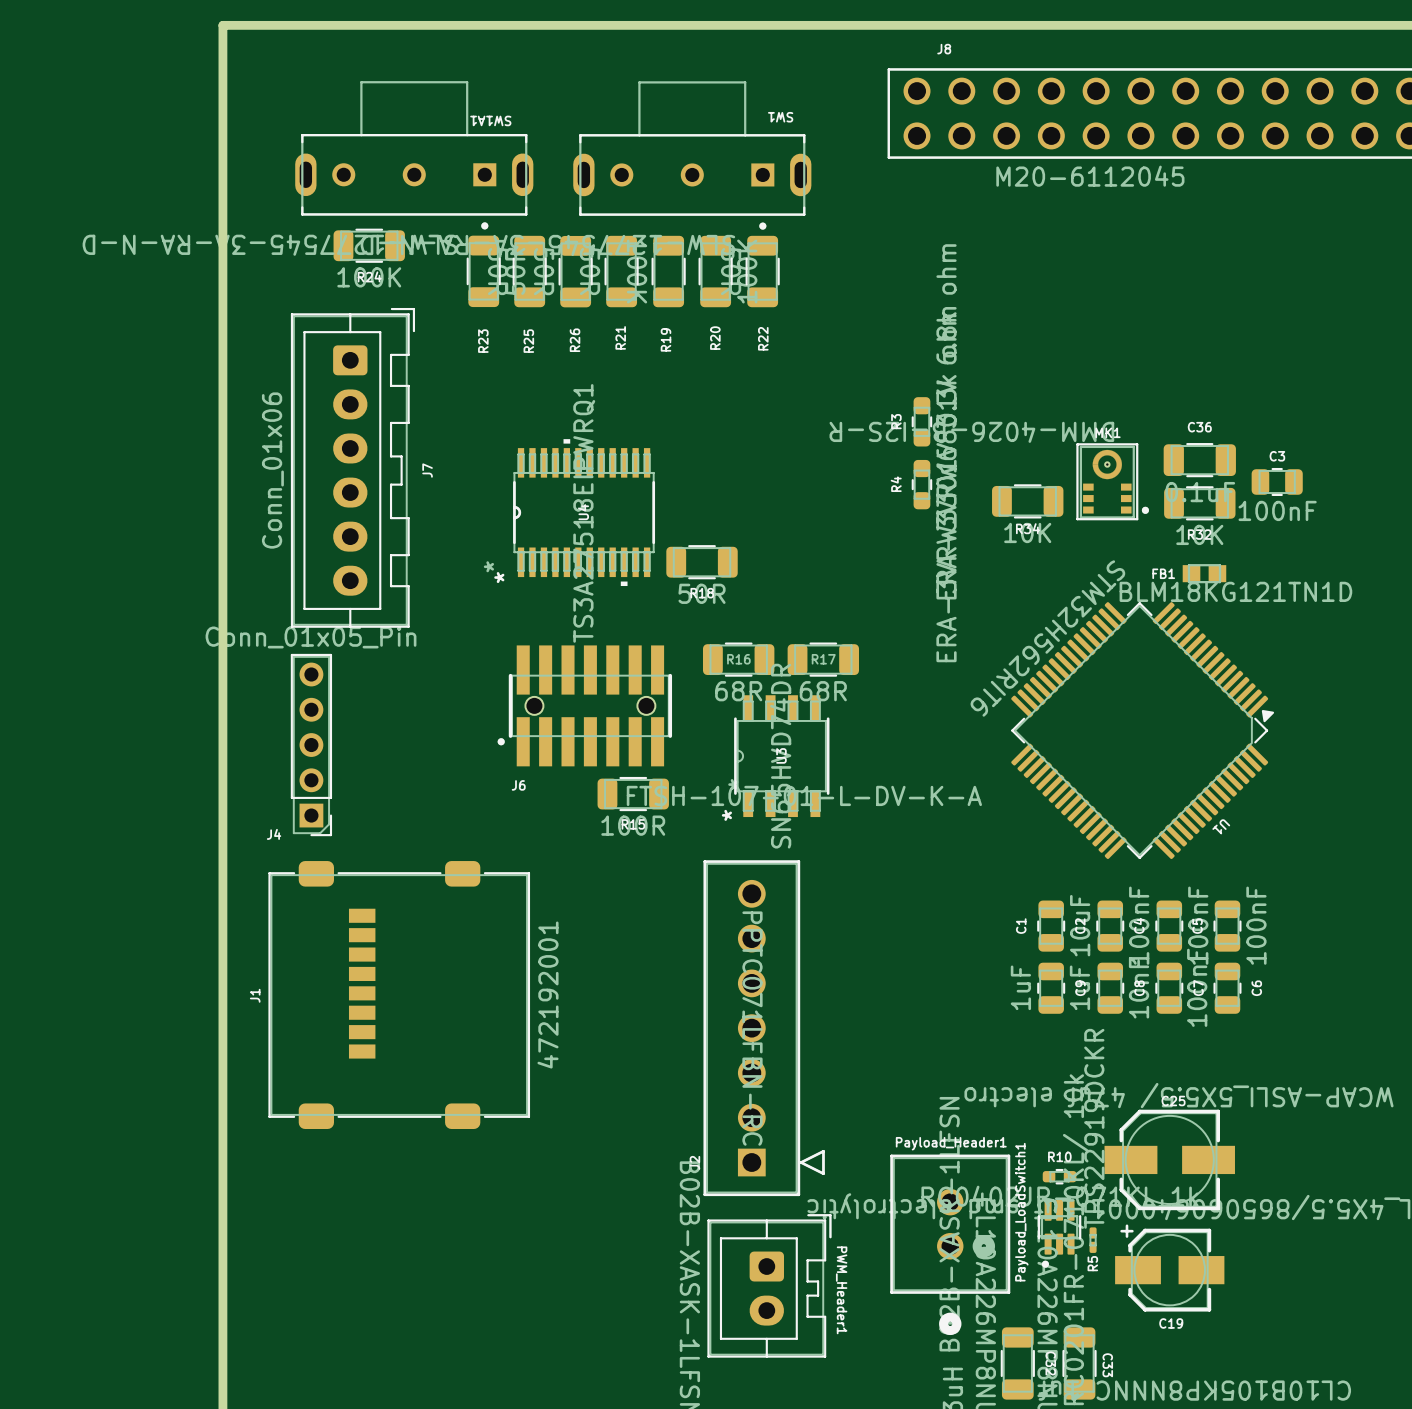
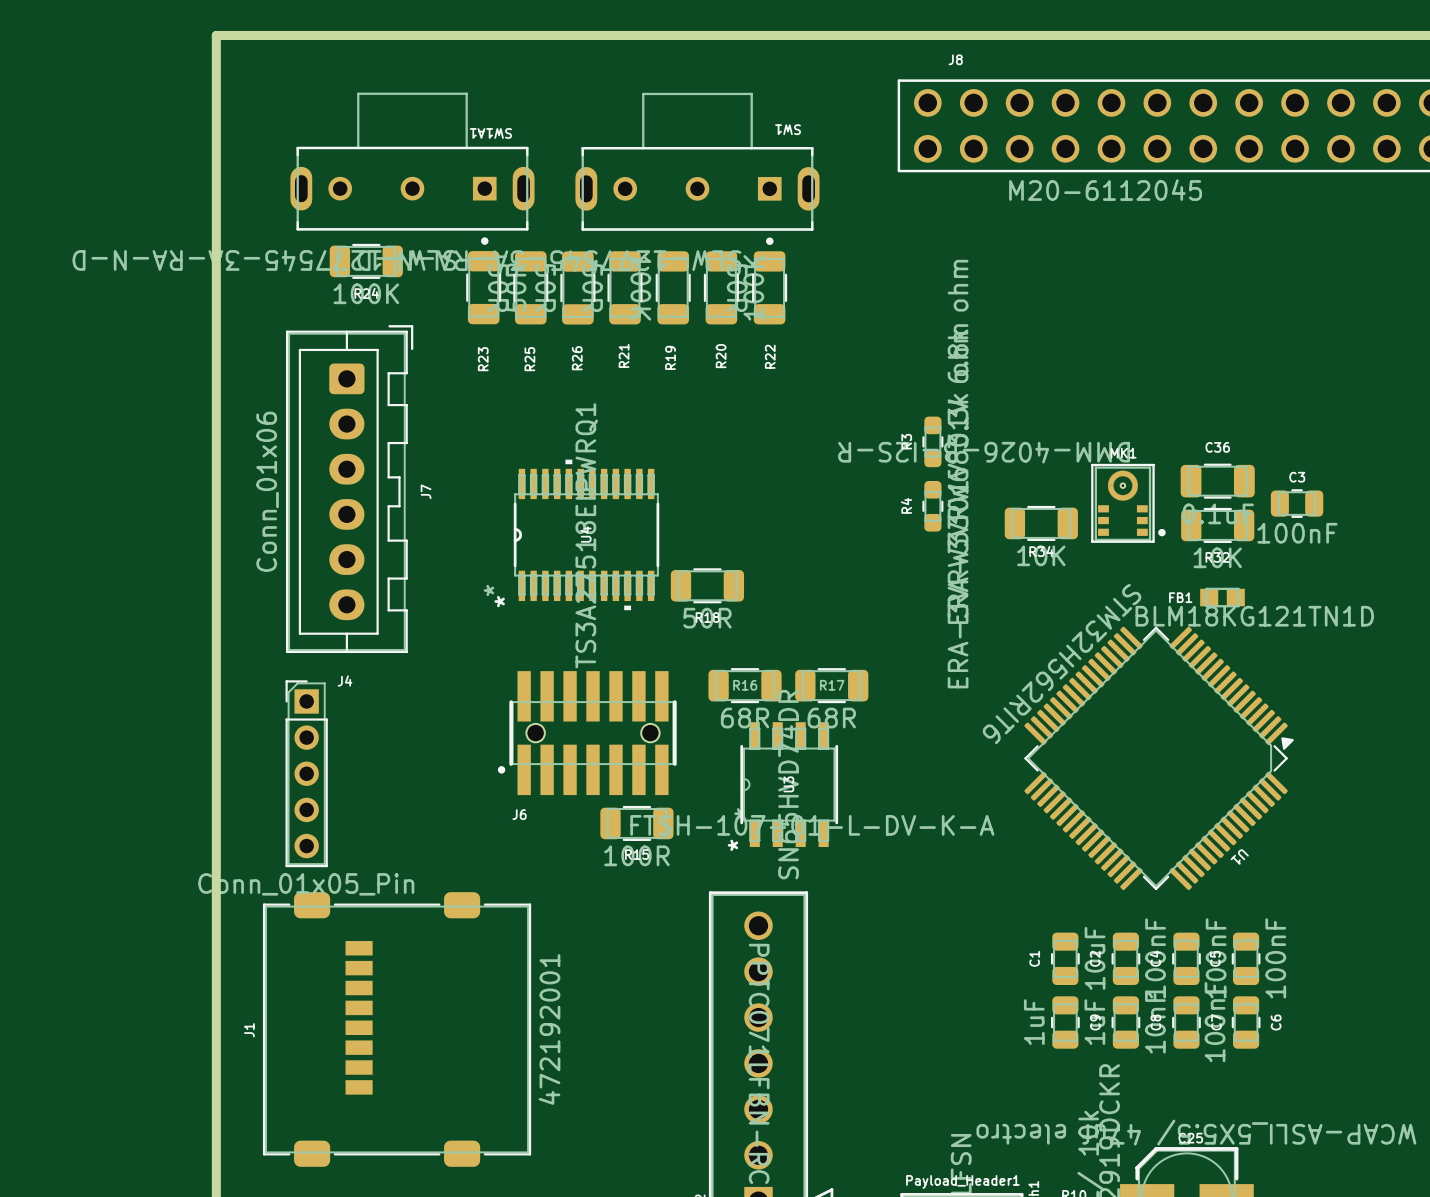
J4 rotation: 0° (311, 745) -> 180° (306, 773)

